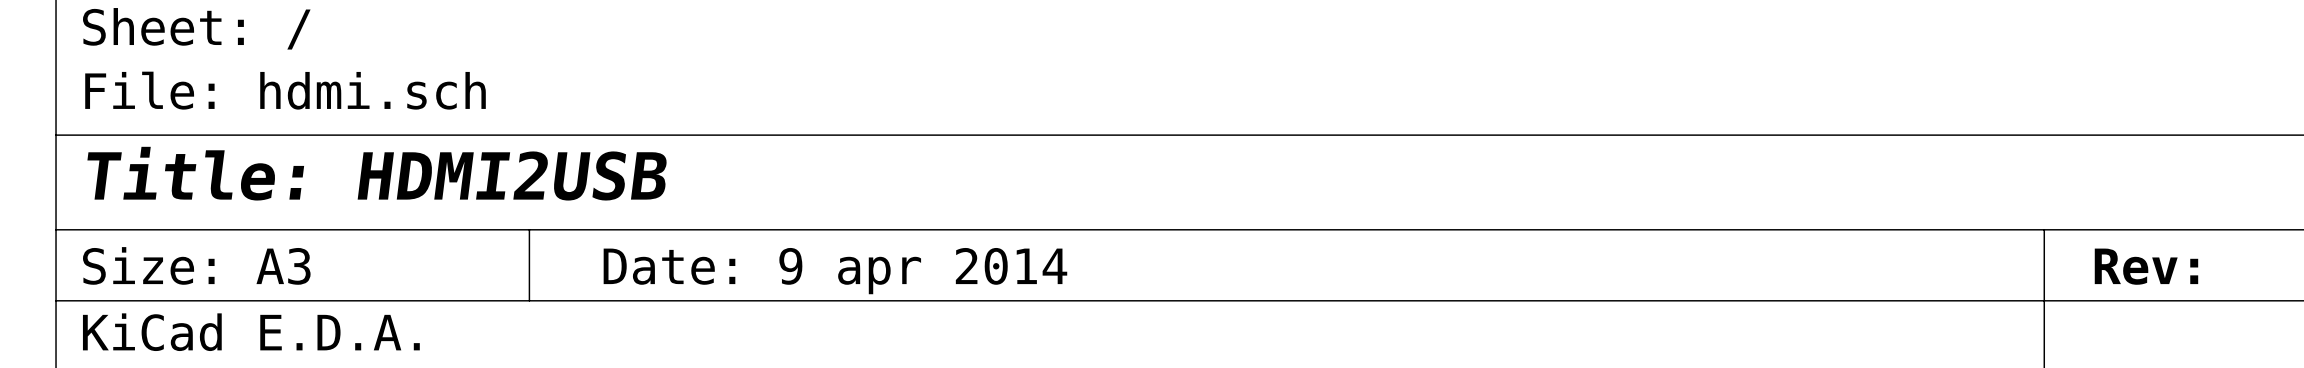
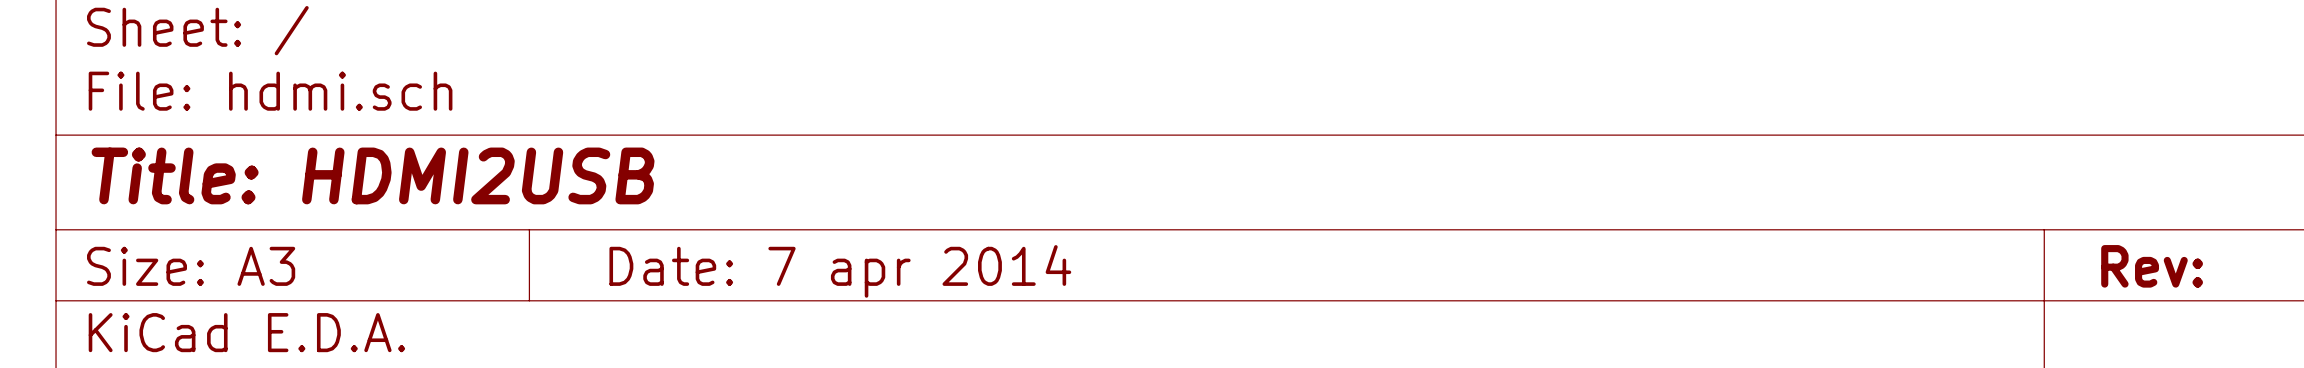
title block: Date: 9 apr 2014 (835, 271) -> Date: 7 apr 2014 (840, 271)

